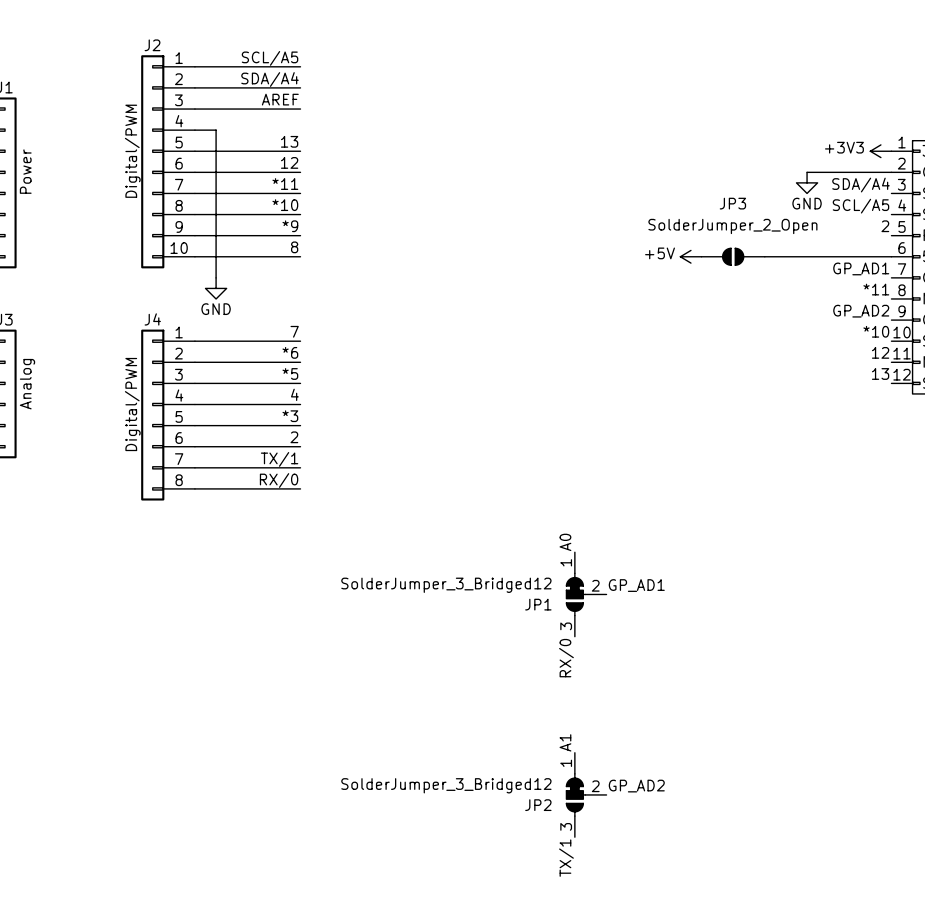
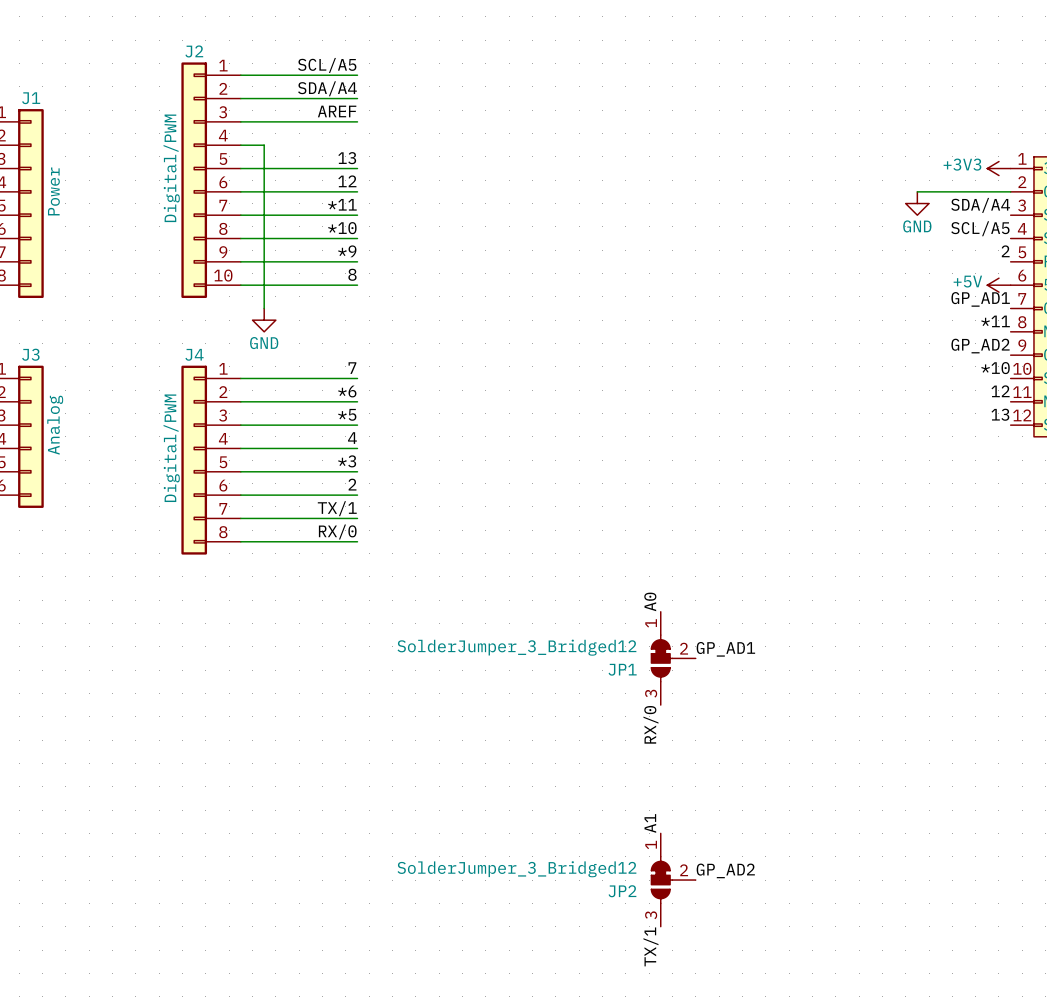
power symbol position: +5V (690, 256) -> +5V (998, 285)
JP3: SolderJumper_2_Open (733, 256) -> none
wire: (764, 256) (891, 256) -> none

